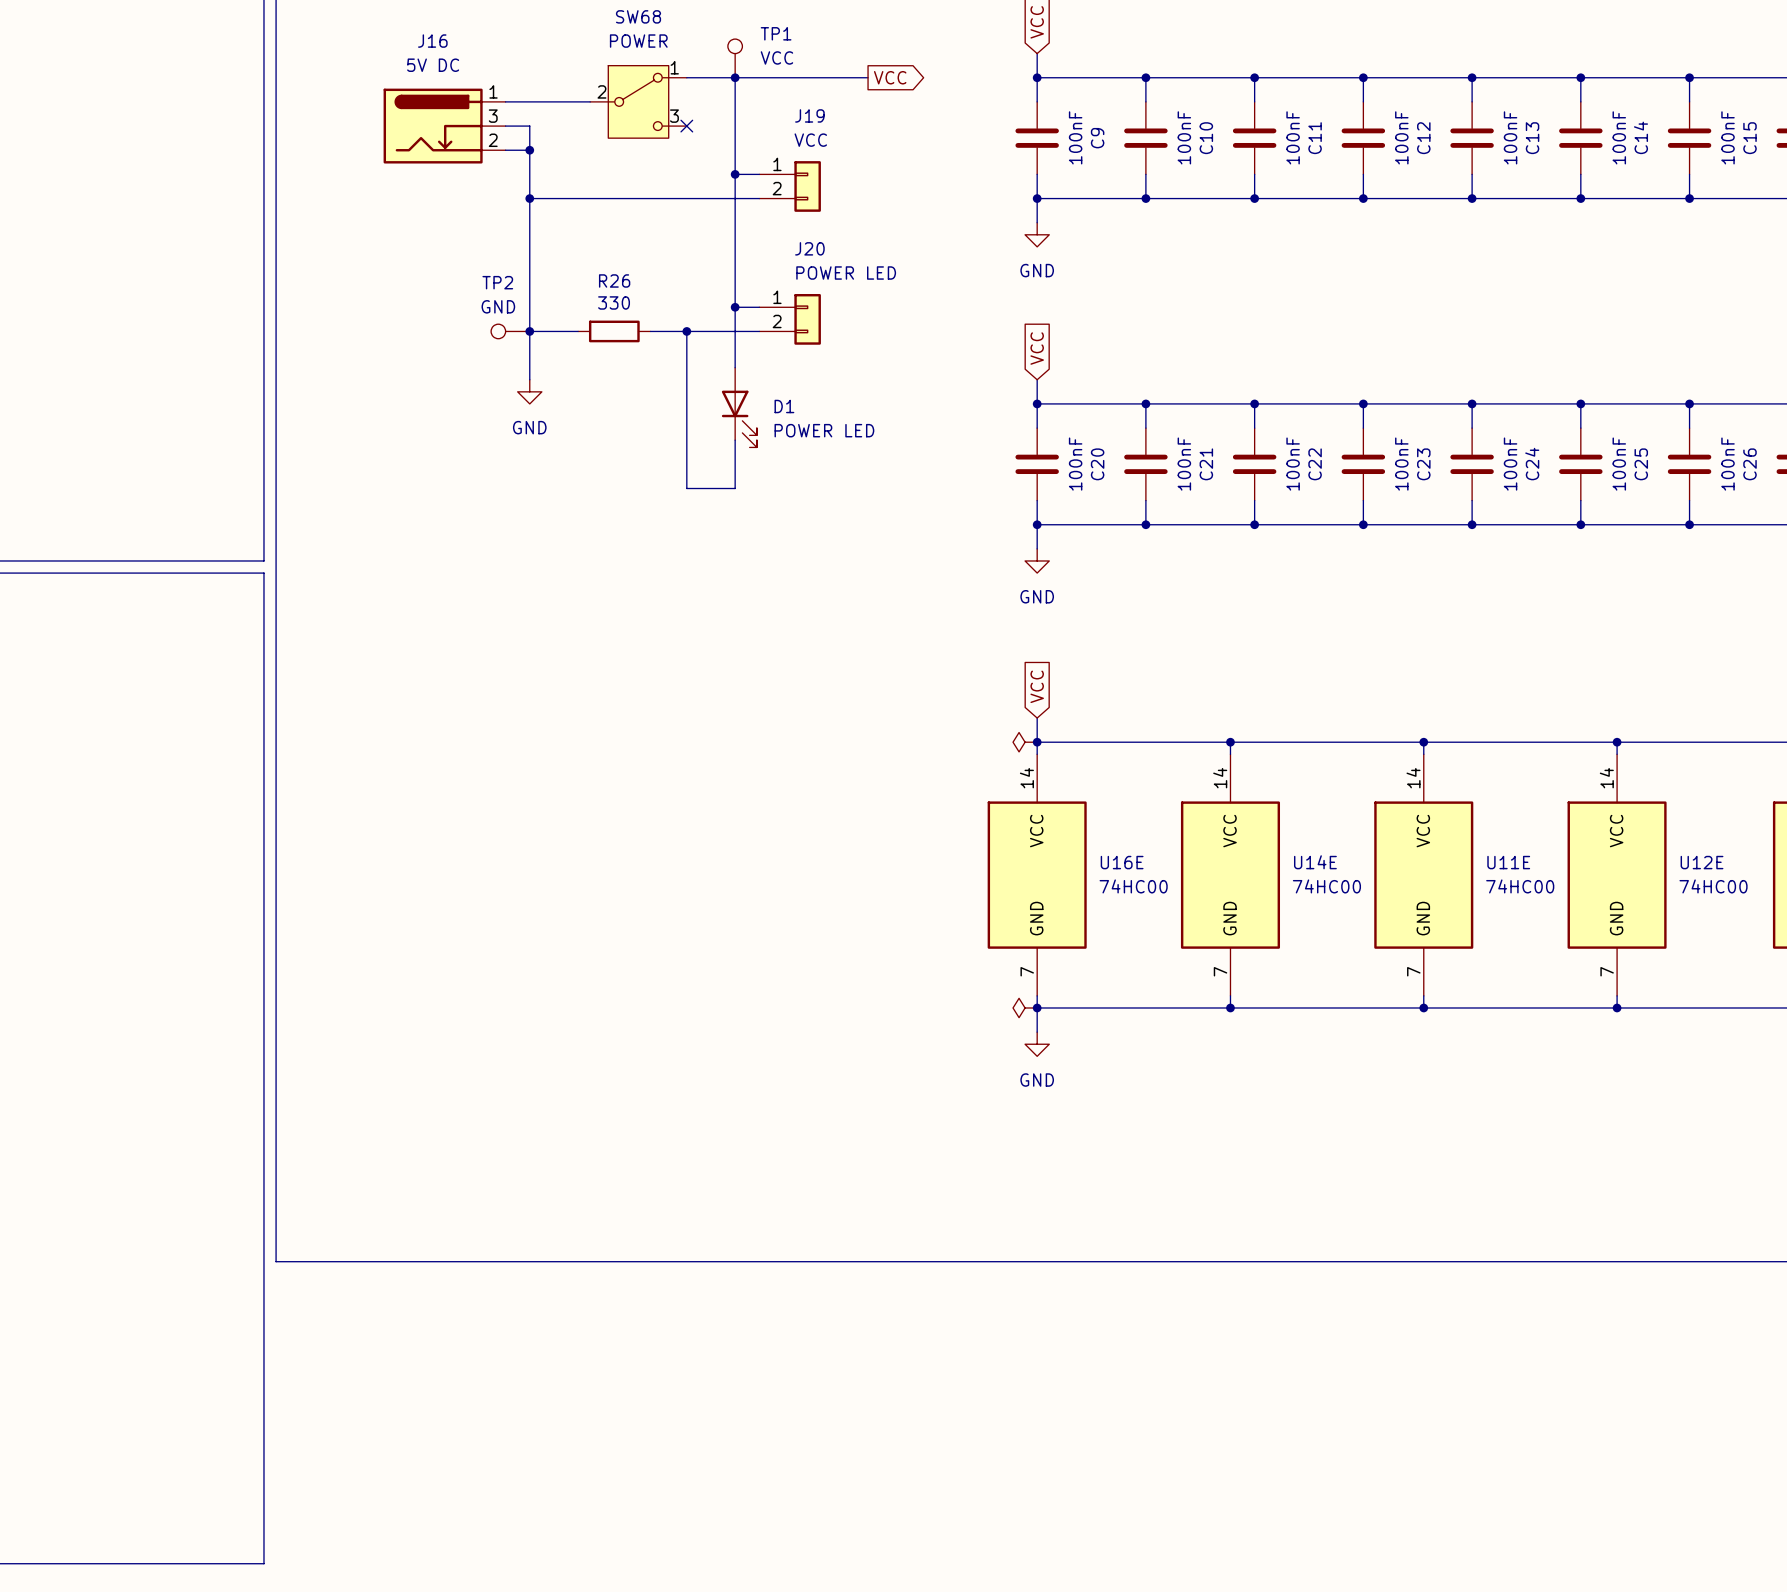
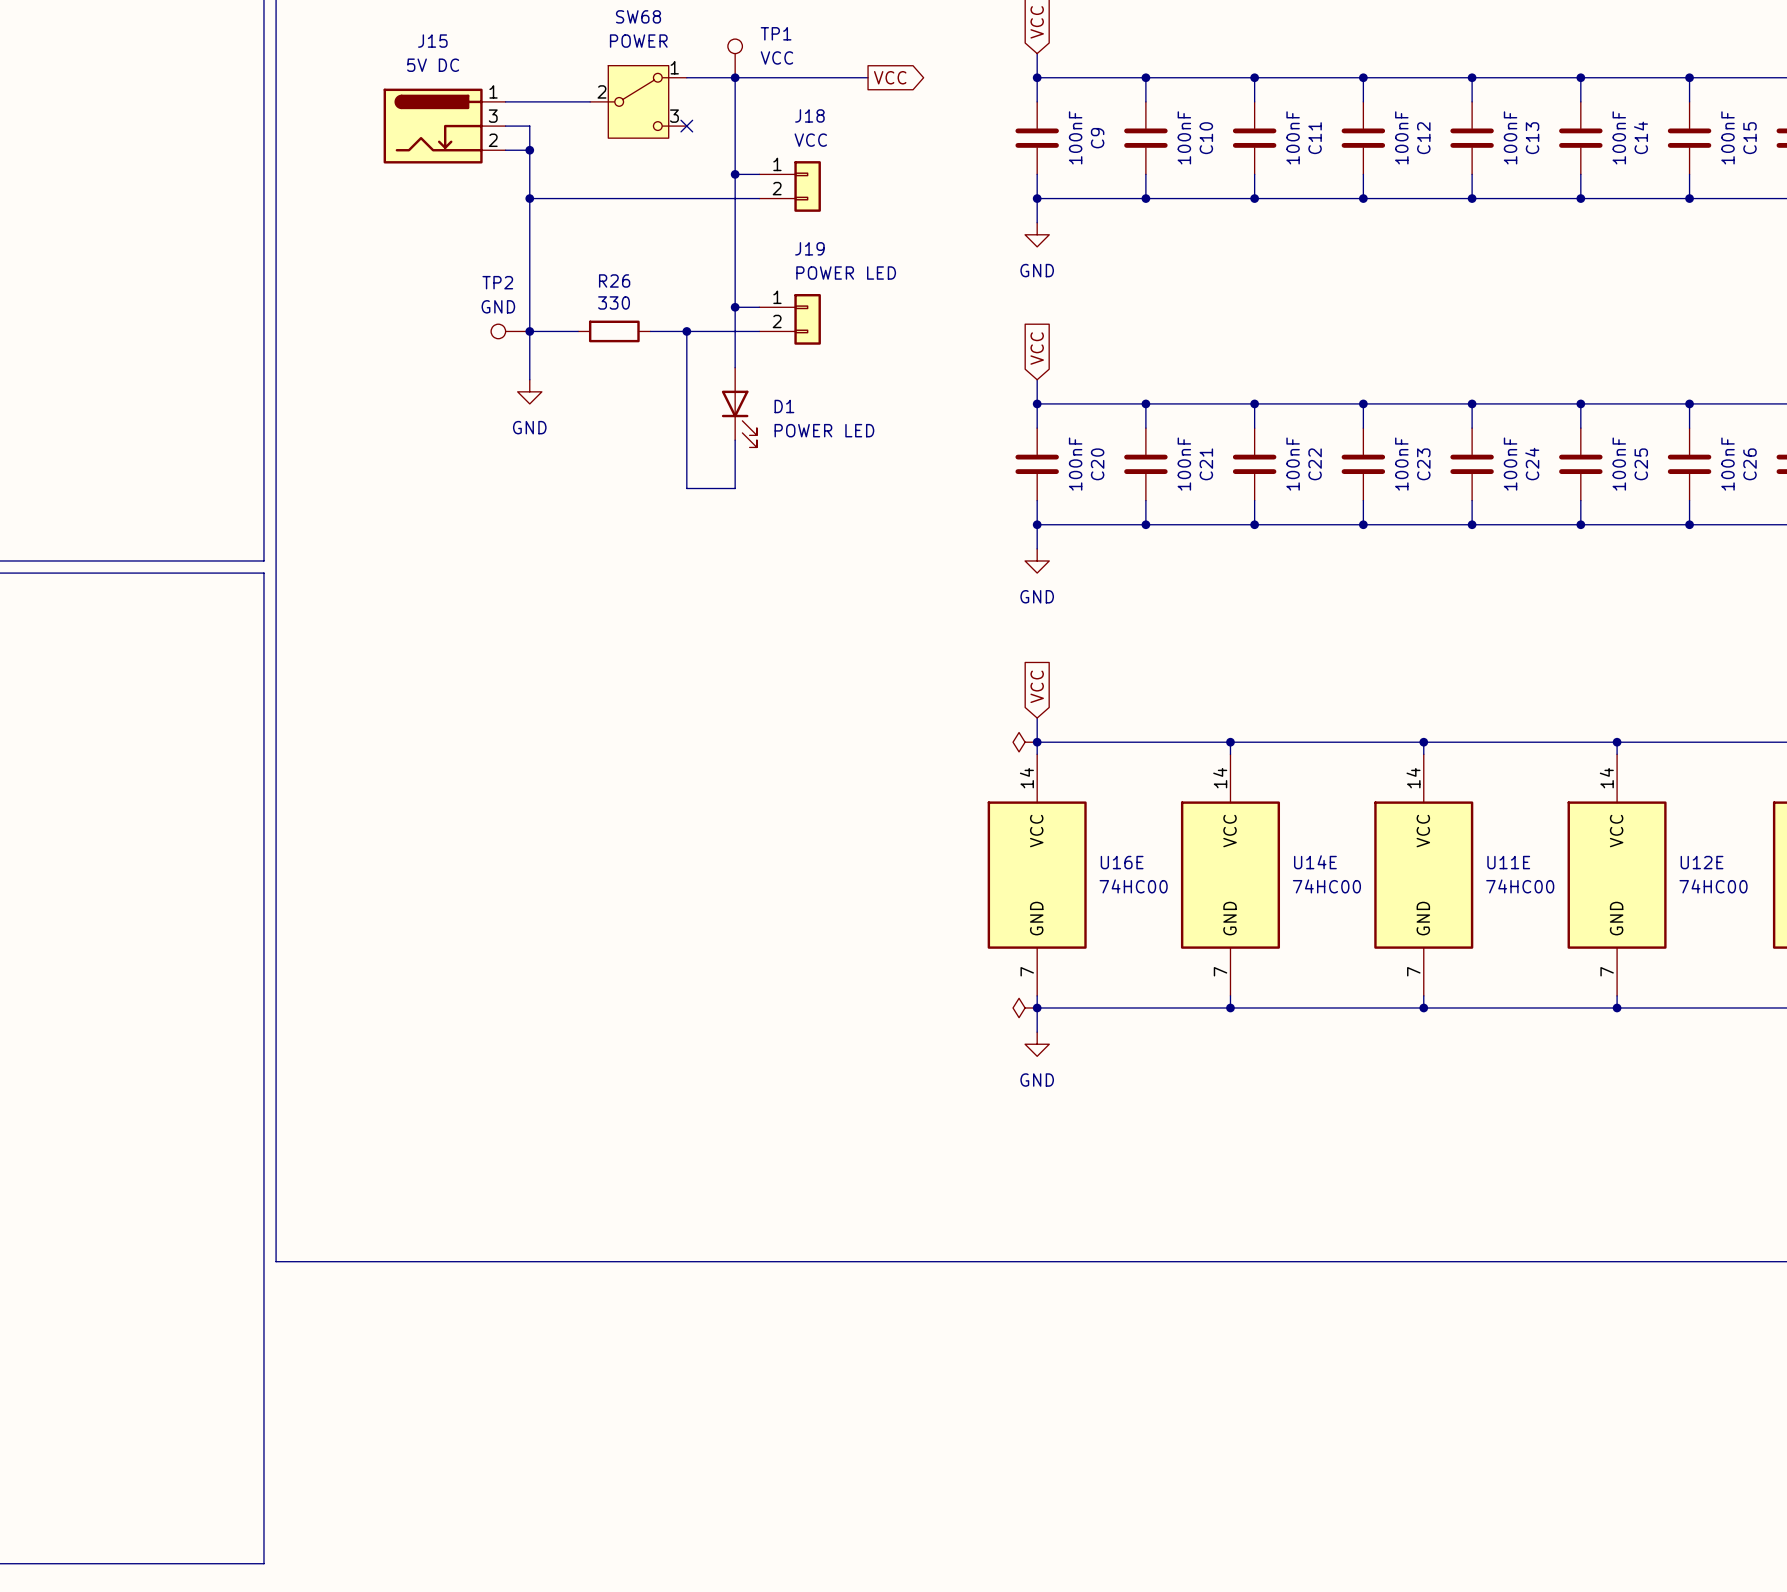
J16 name: J16 (432, 41) -> J15 (432, 41)
J19 name: J19 (809, 115) -> J18 (809, 115)
J20 name: J20 (809, 248) -> J19 (809, 248)

